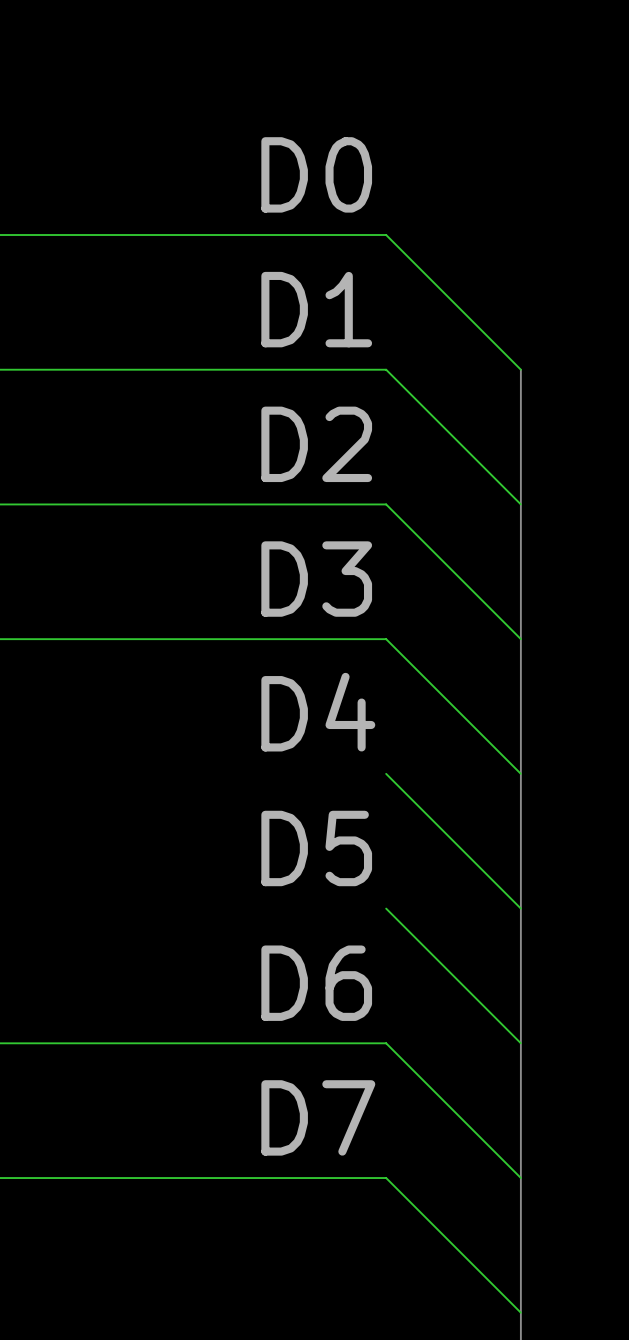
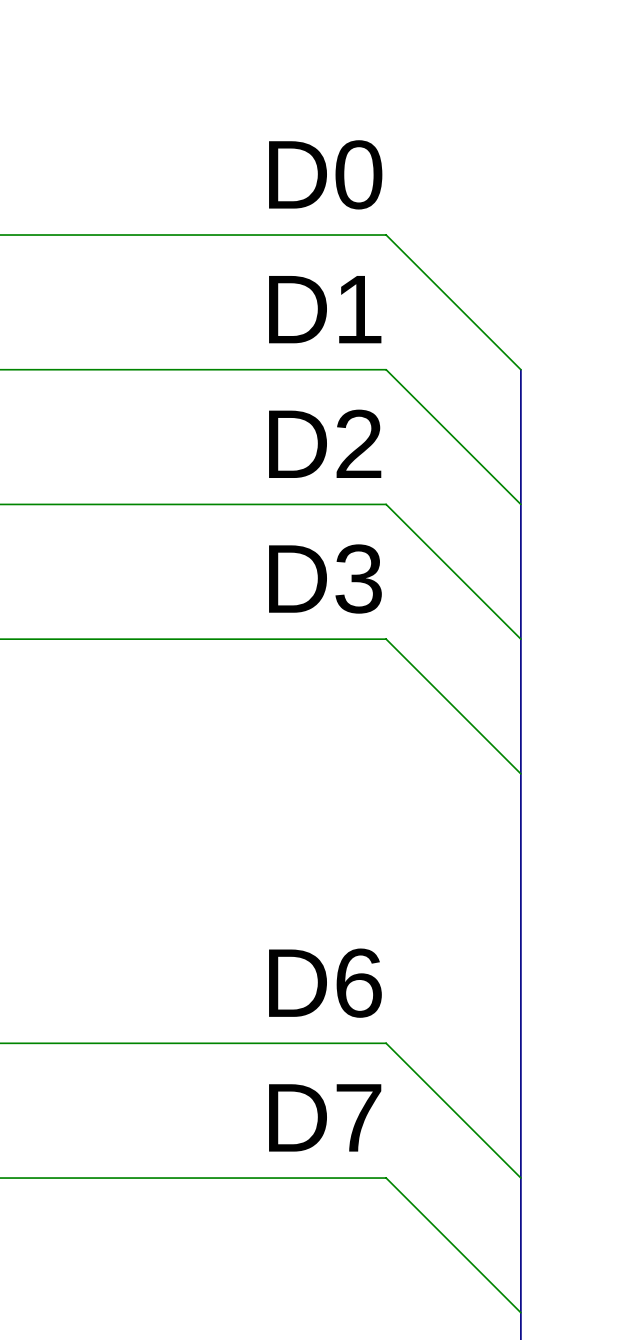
label: D4 (318, 712) -> none
wire: (386, 773) (520, 908) -> none
label: D5 (316, 848) -> none
wire: (386, 908) (520, 1043) -> none

